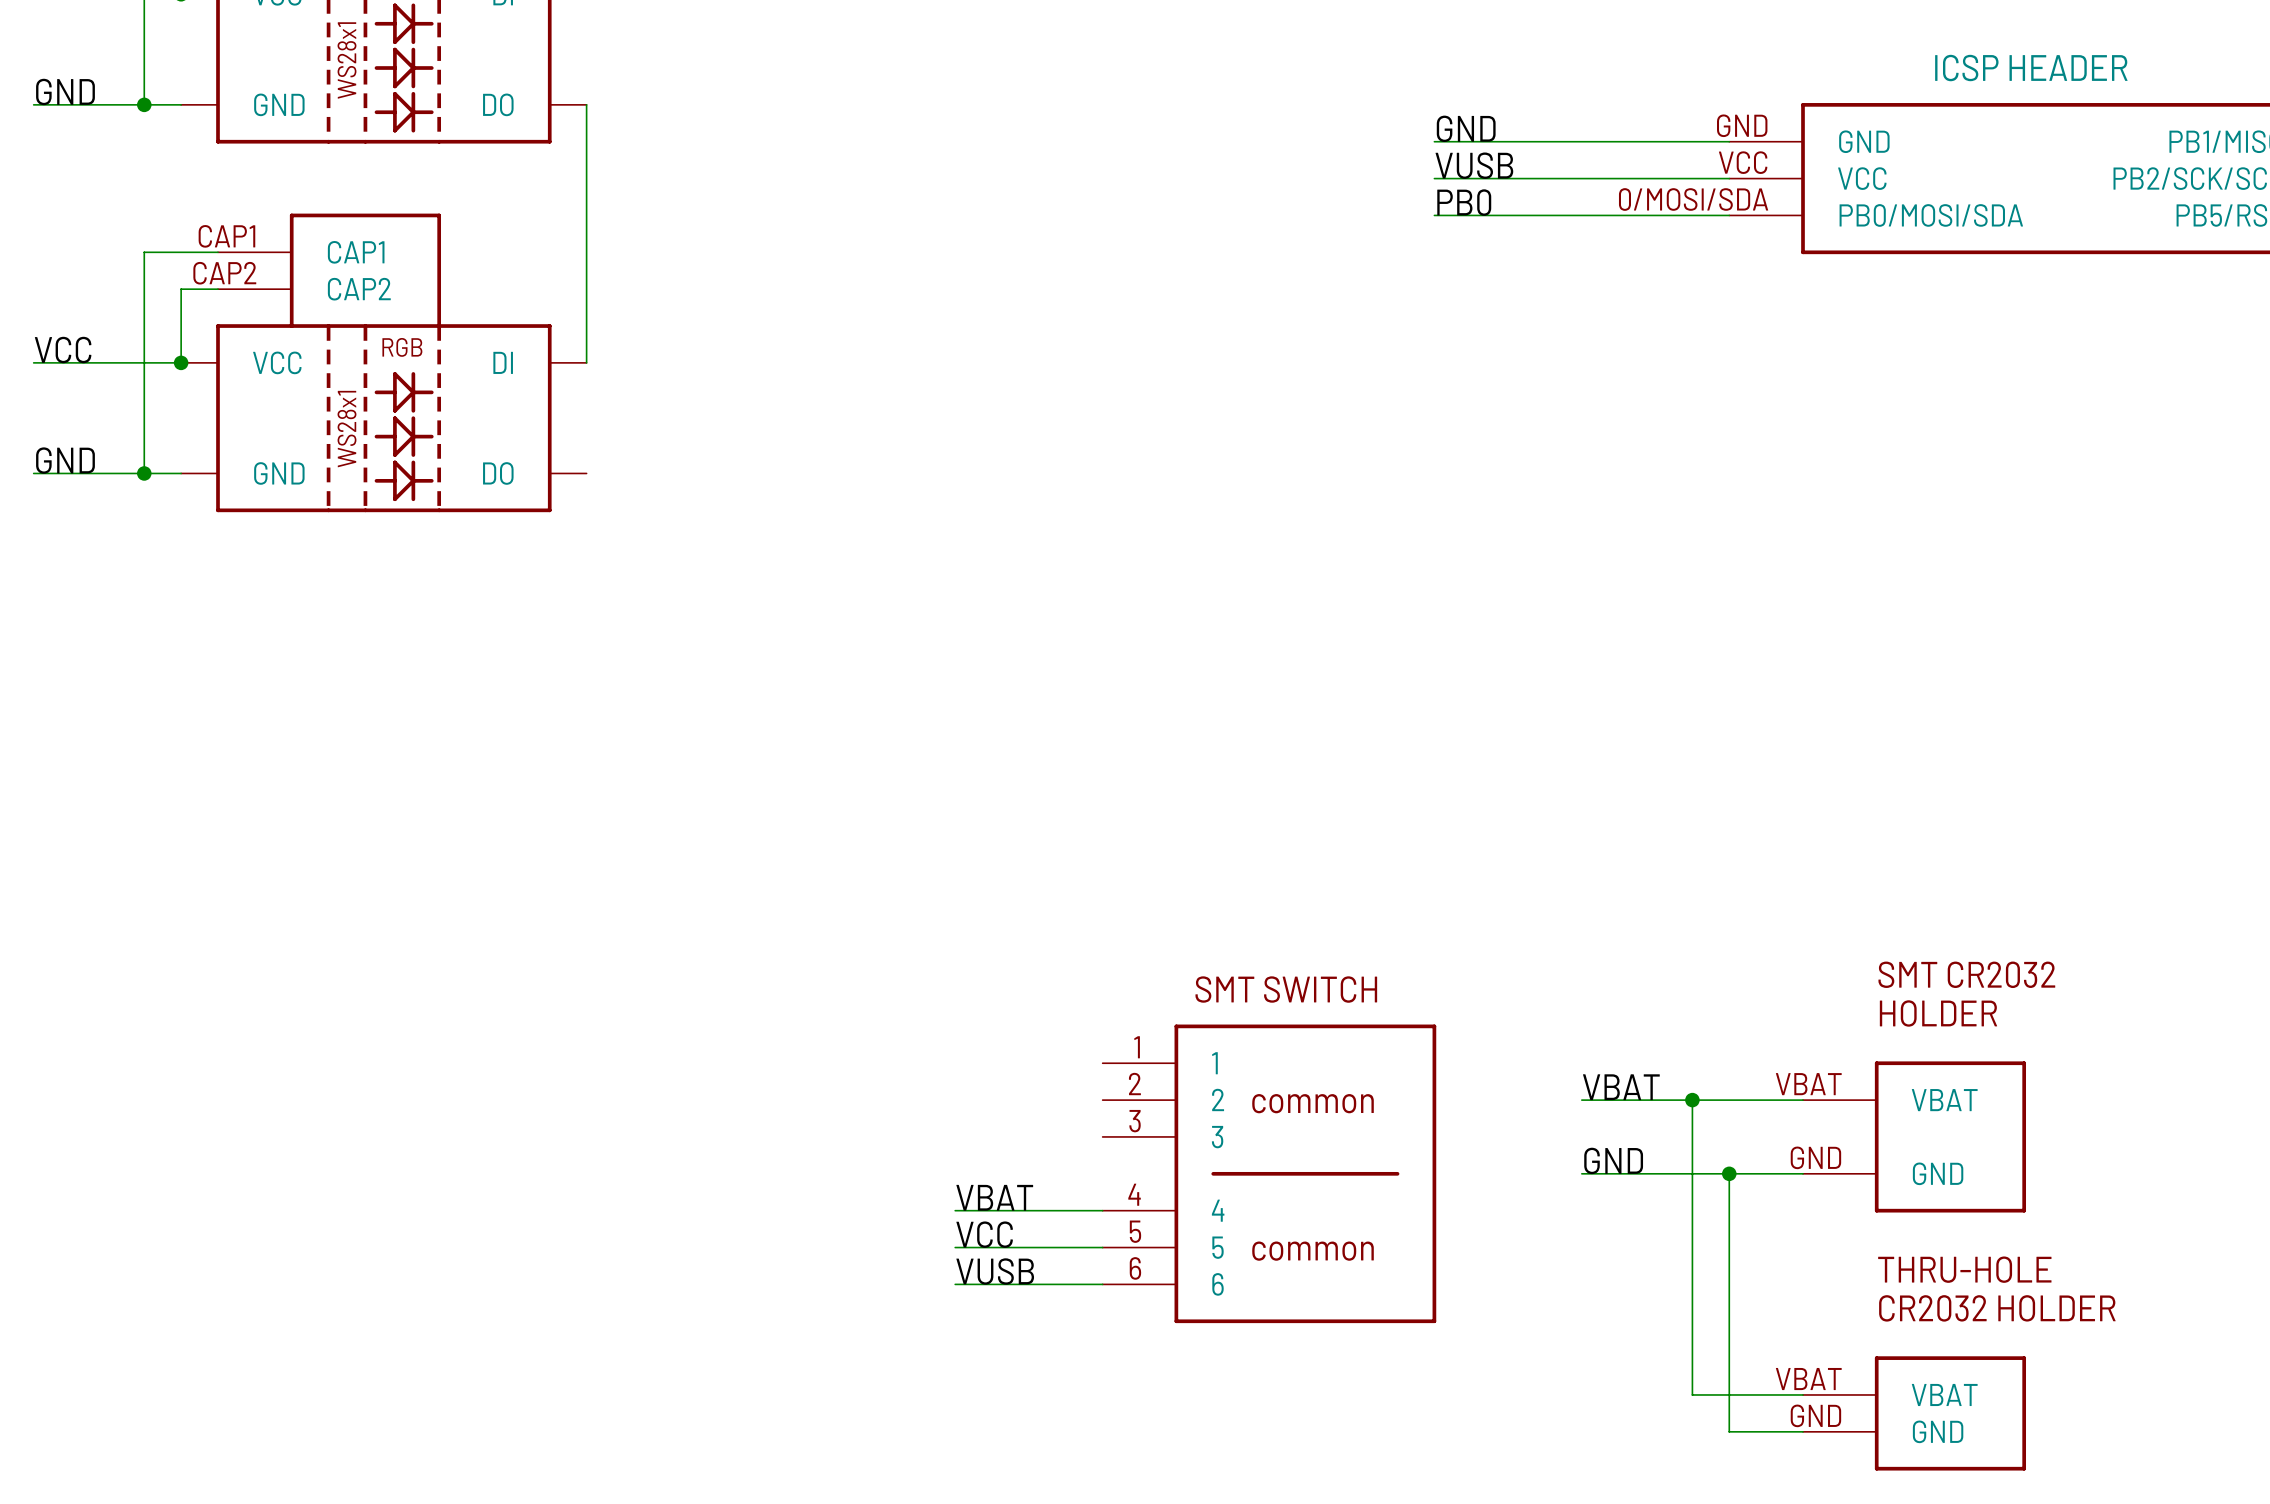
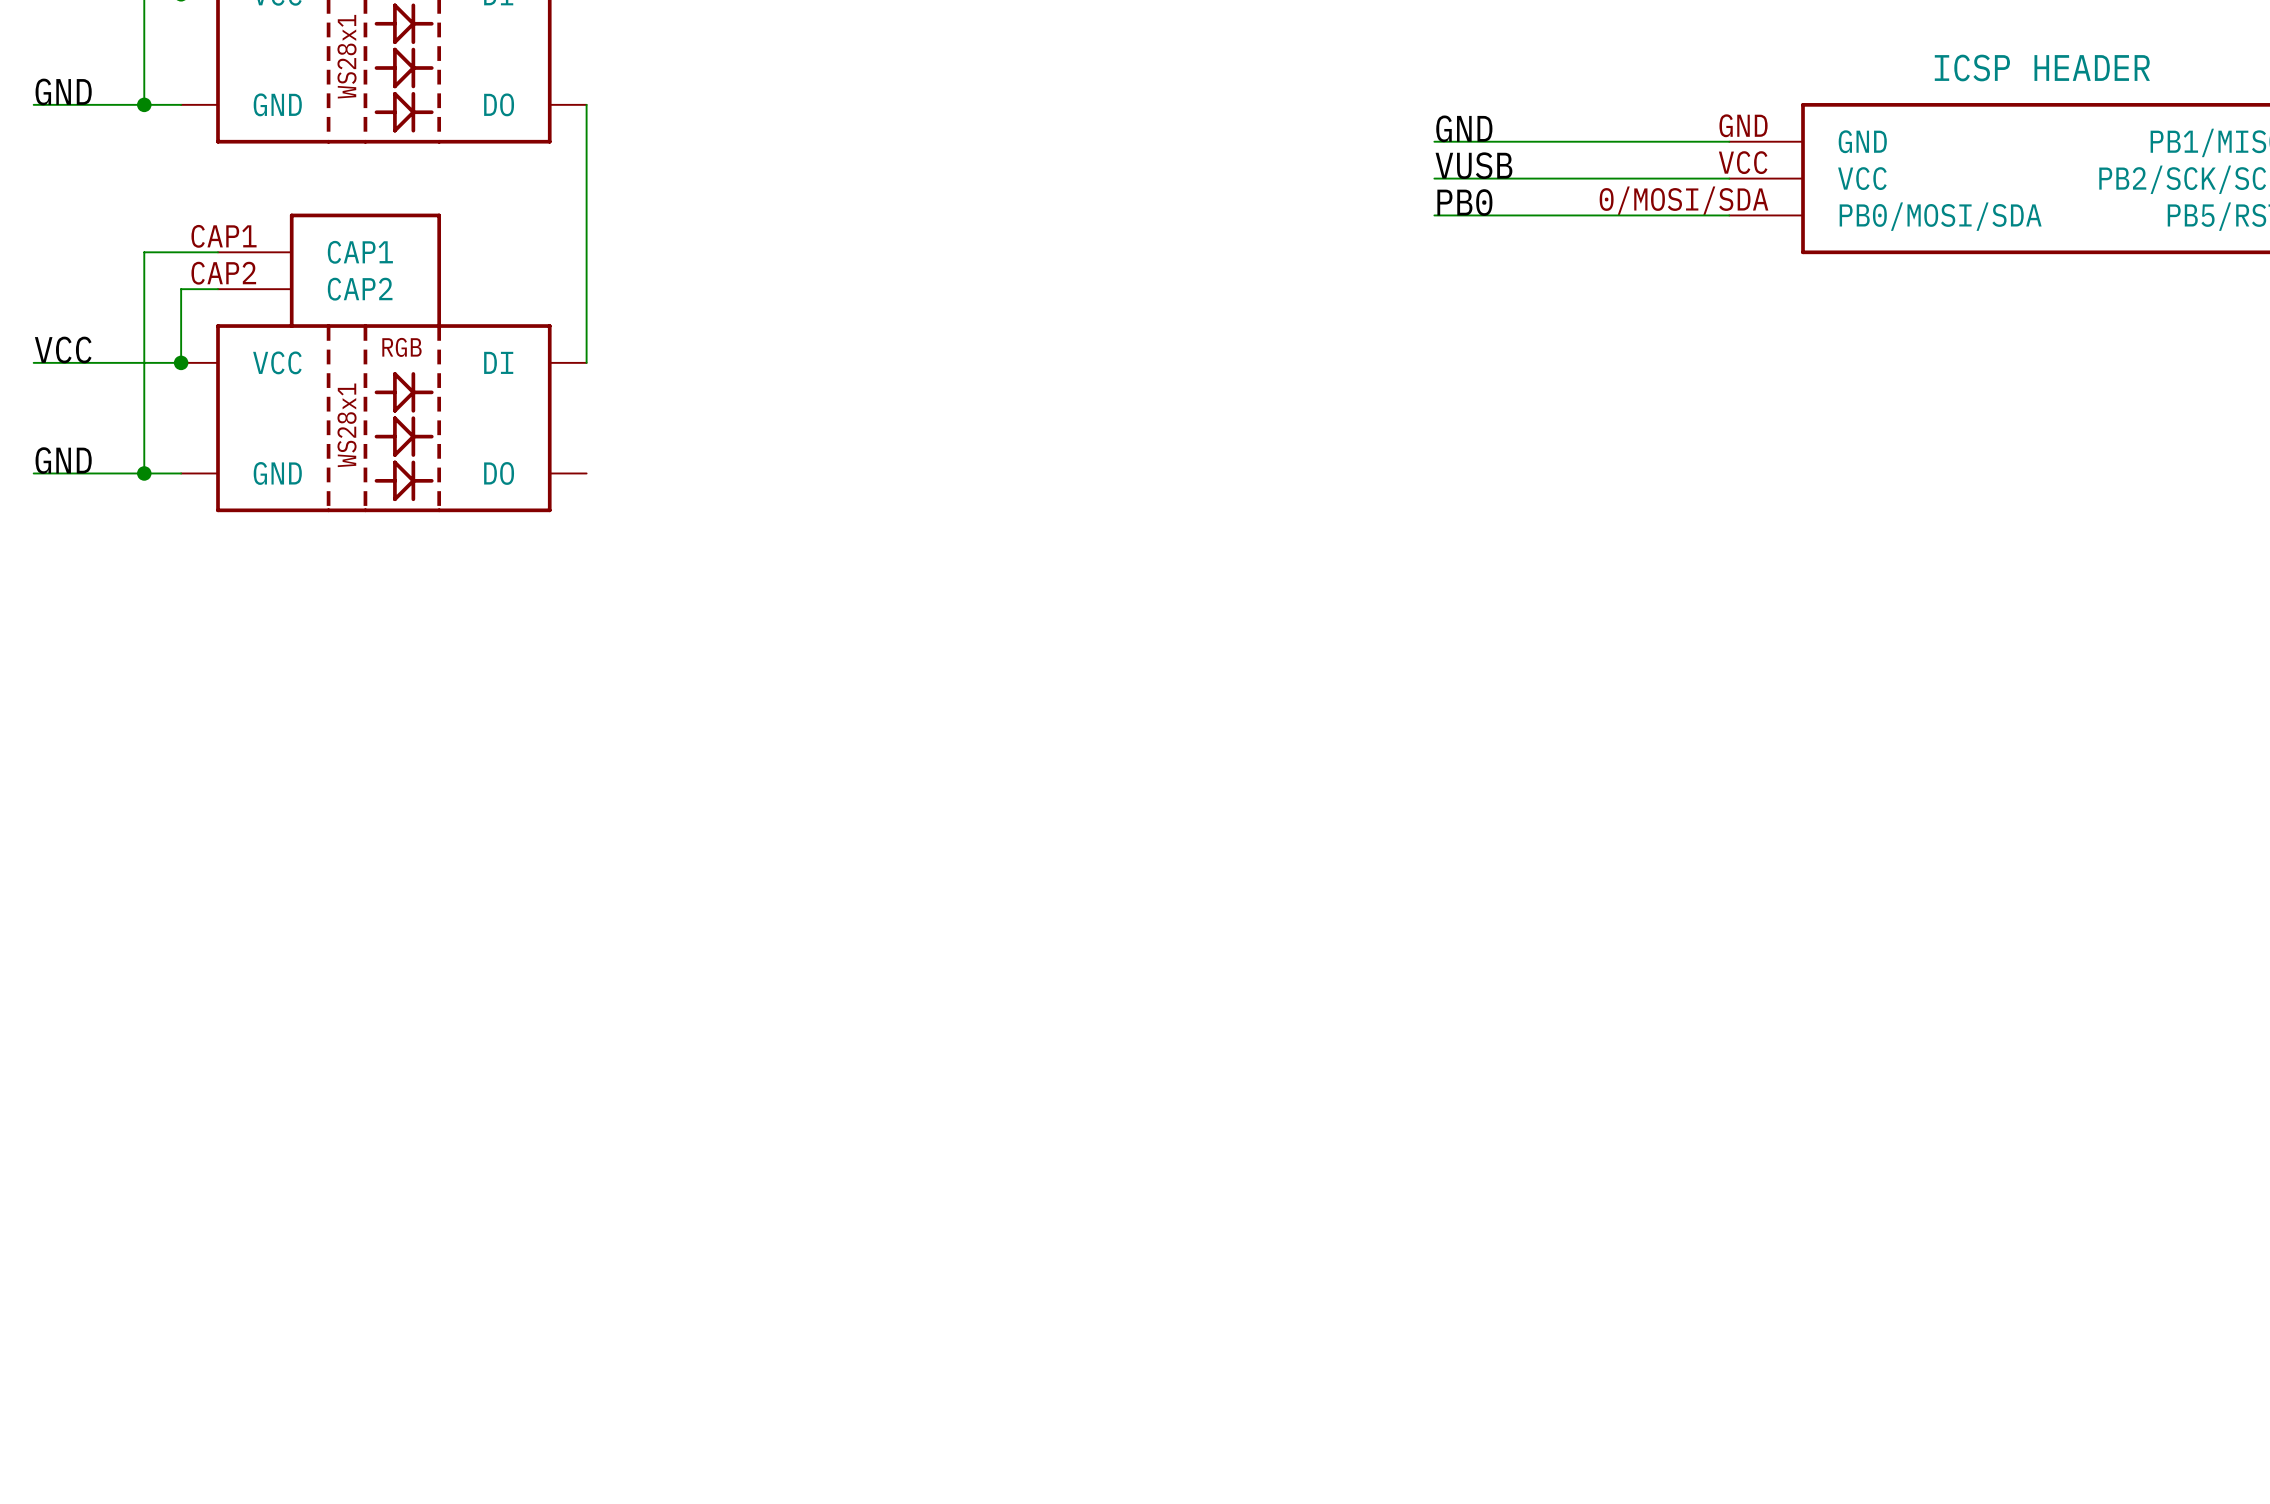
label: VBAT (1621, 1087) -> none
wire: (1581, 1100) (1803, 1100) -> none
wire: (1692, 1100) (1692, 1394) (1803, 1394) -> none
junction: (1692, 1100) -> none
part: (1914, 1136) -> none
label: GND (1613, 1160) -> none
part: (1269, 1173) -> none
wire: (1581, 1173) (1803, 1173) -> none
wire: (1729, 1173) (1729, 1431) (1803, 1431) -> none
junction: (1729, 1173) -> none
label: VBAT (994, 1197) -> none
wire: (955, 1210) (1102, 1210) -> none
label: VCC (984, 1234) -> none
wire: (955, 1247) (1102, 1247) -> none
label: VUSB (995, 1271) -> none
wire: (955, 1284) (1102, 1284) -> none
part: (1914, 1413) -> none

